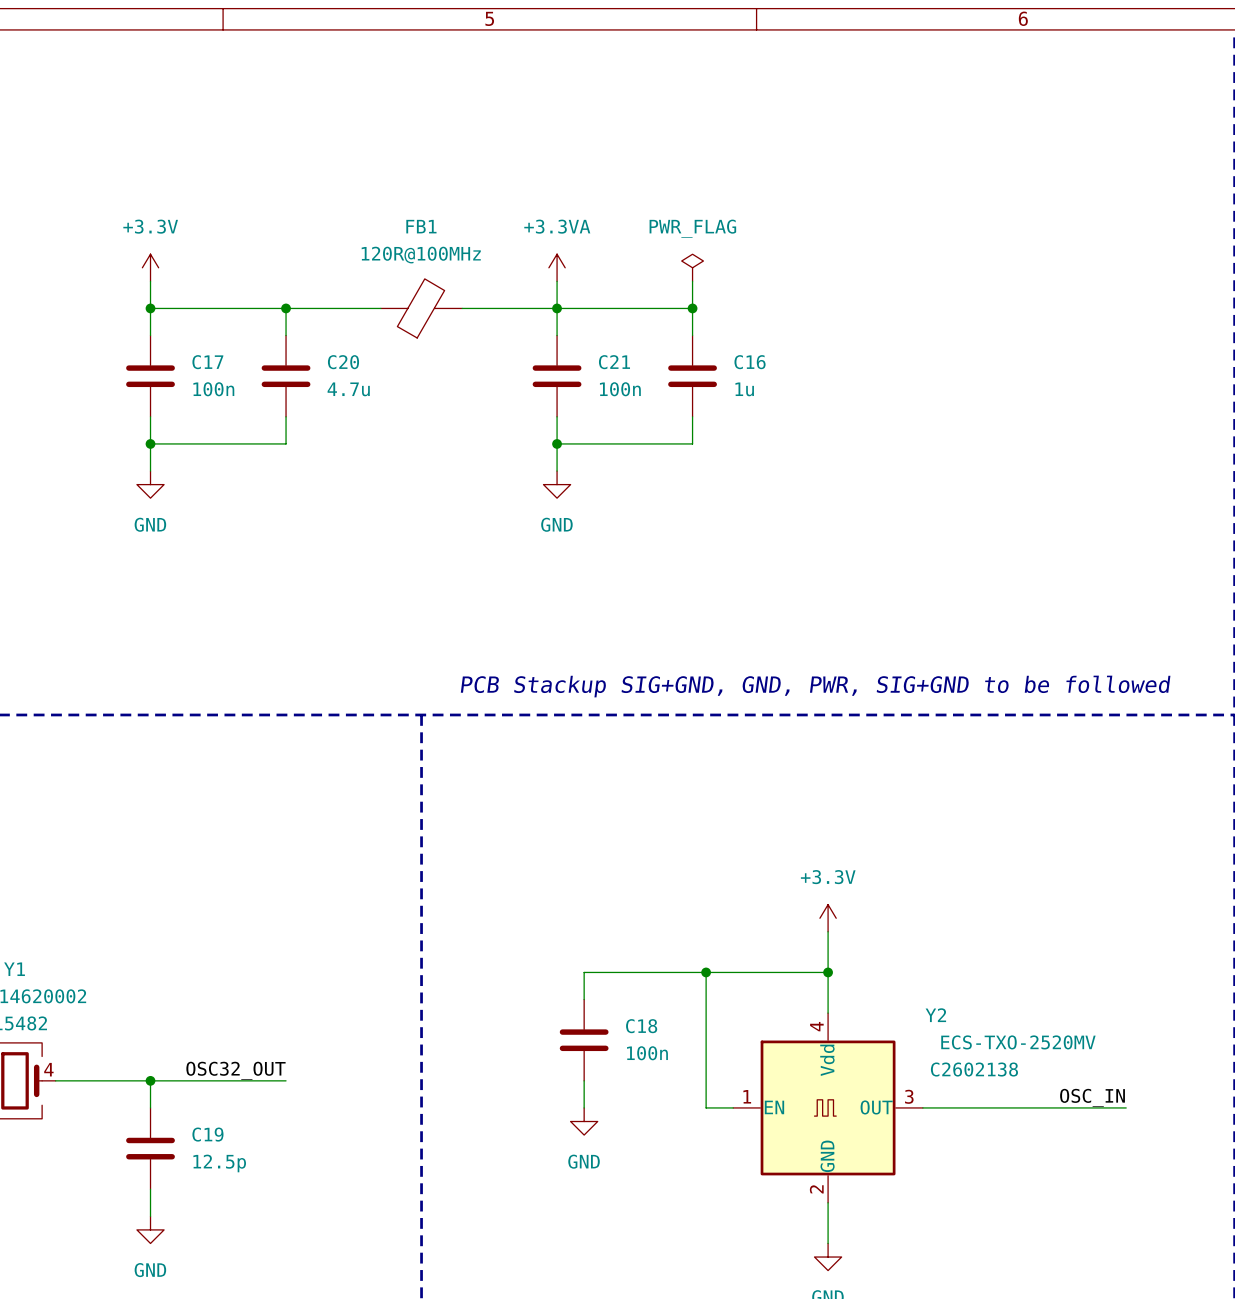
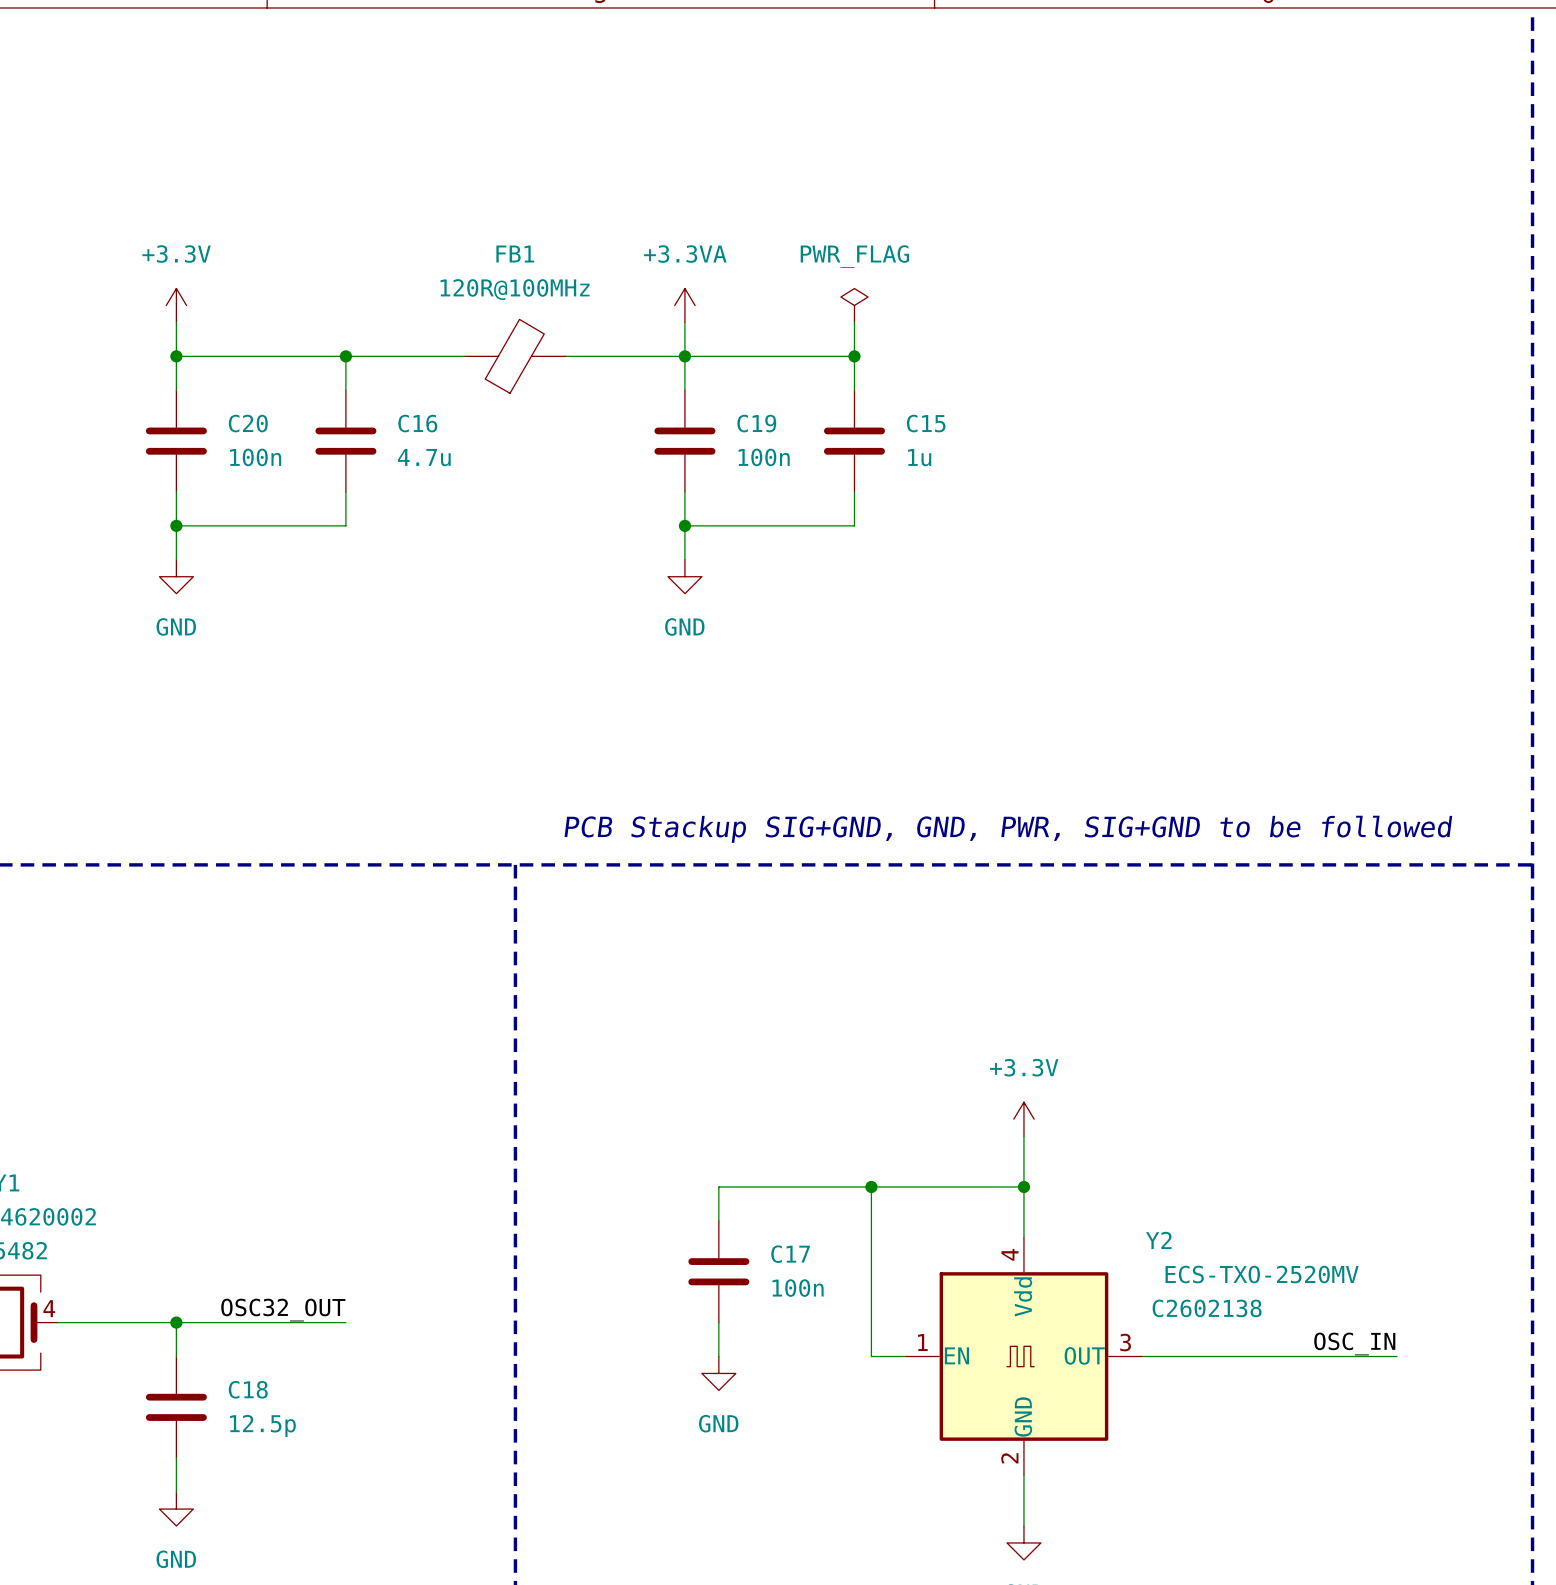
C17 name: C17 (207, 362) -> C20 (248, 423)
C20 name: C20 (343, 362) -> C16 (417, 423)
C21 name: C21 (614, 362) -> C19 (756, 423)
C16 name: C16 (750, 362) -> C15 (926, 423)
C18 name: C18 (641, 1026) -> C17 (790, 1254)
C19 name: C19 (207, 1134) -> C18 (248, 1389)

